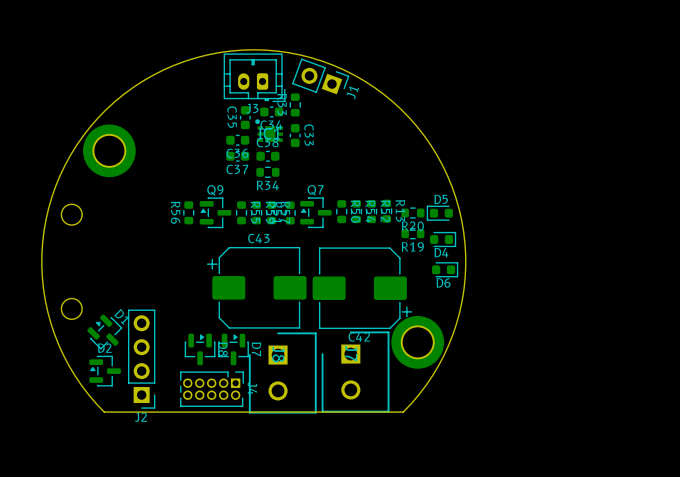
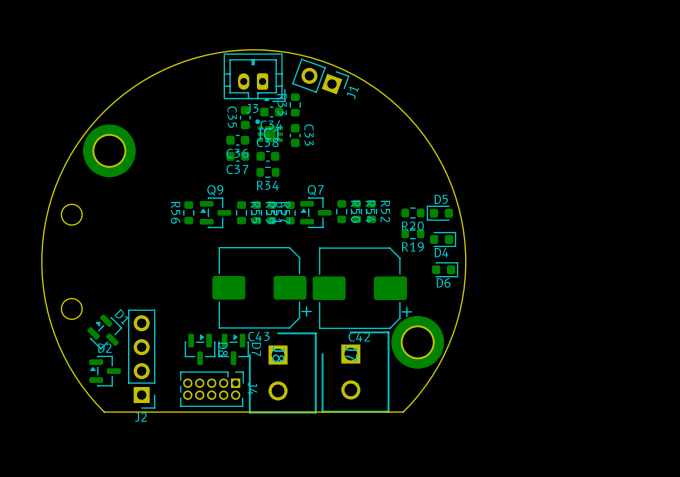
R13: (386, 211) -> none
C43 rotation: 0° (256, 287) -> 180° (262, 287)

